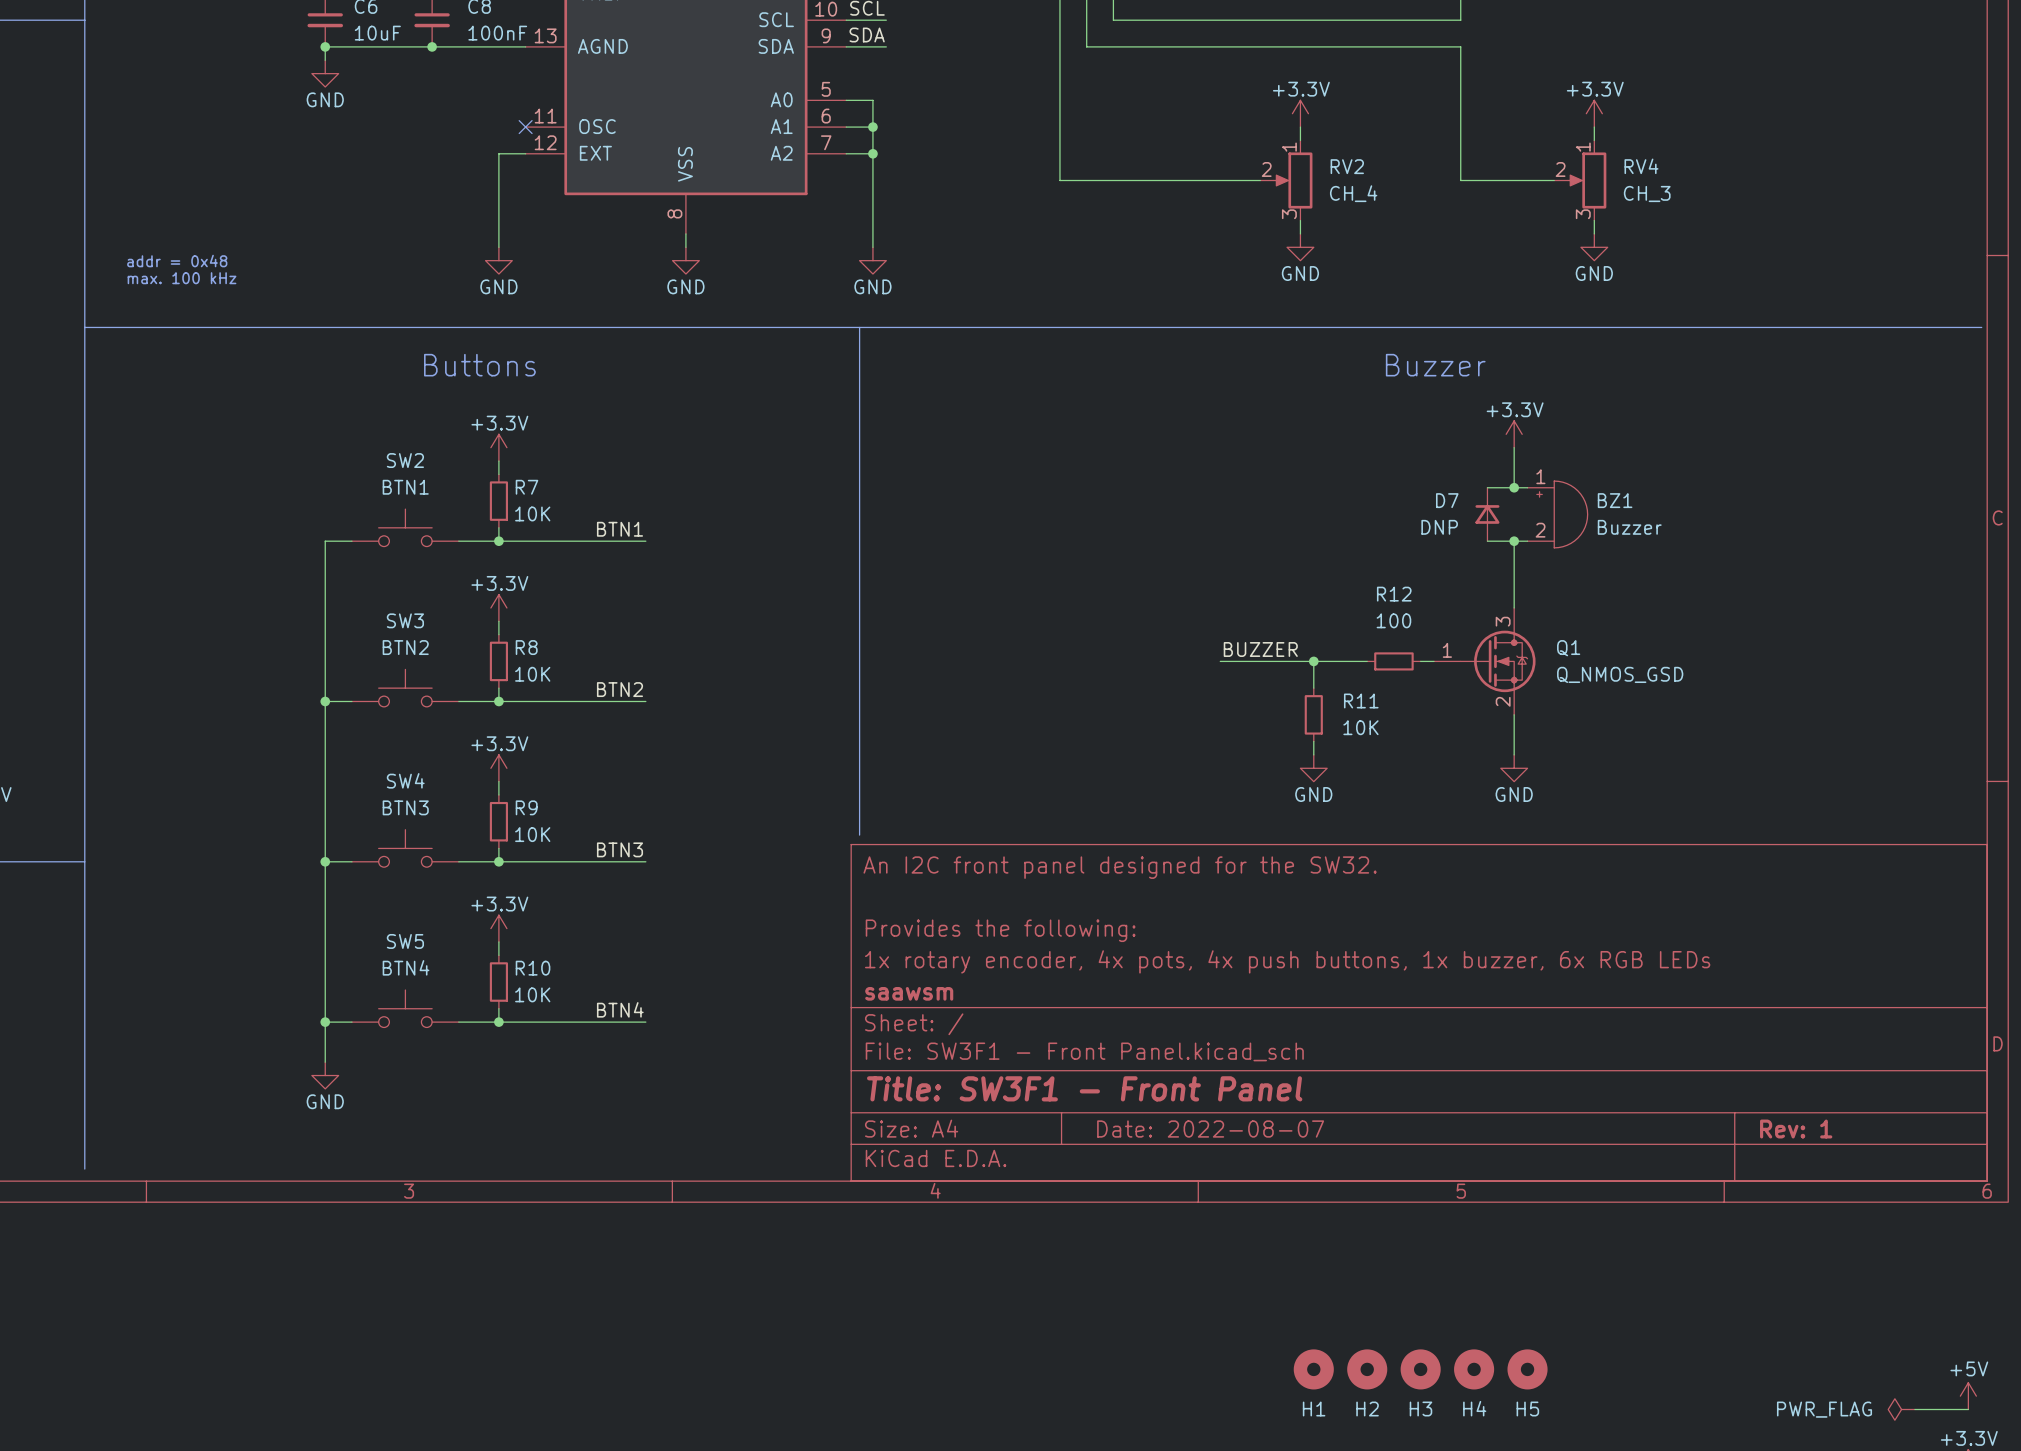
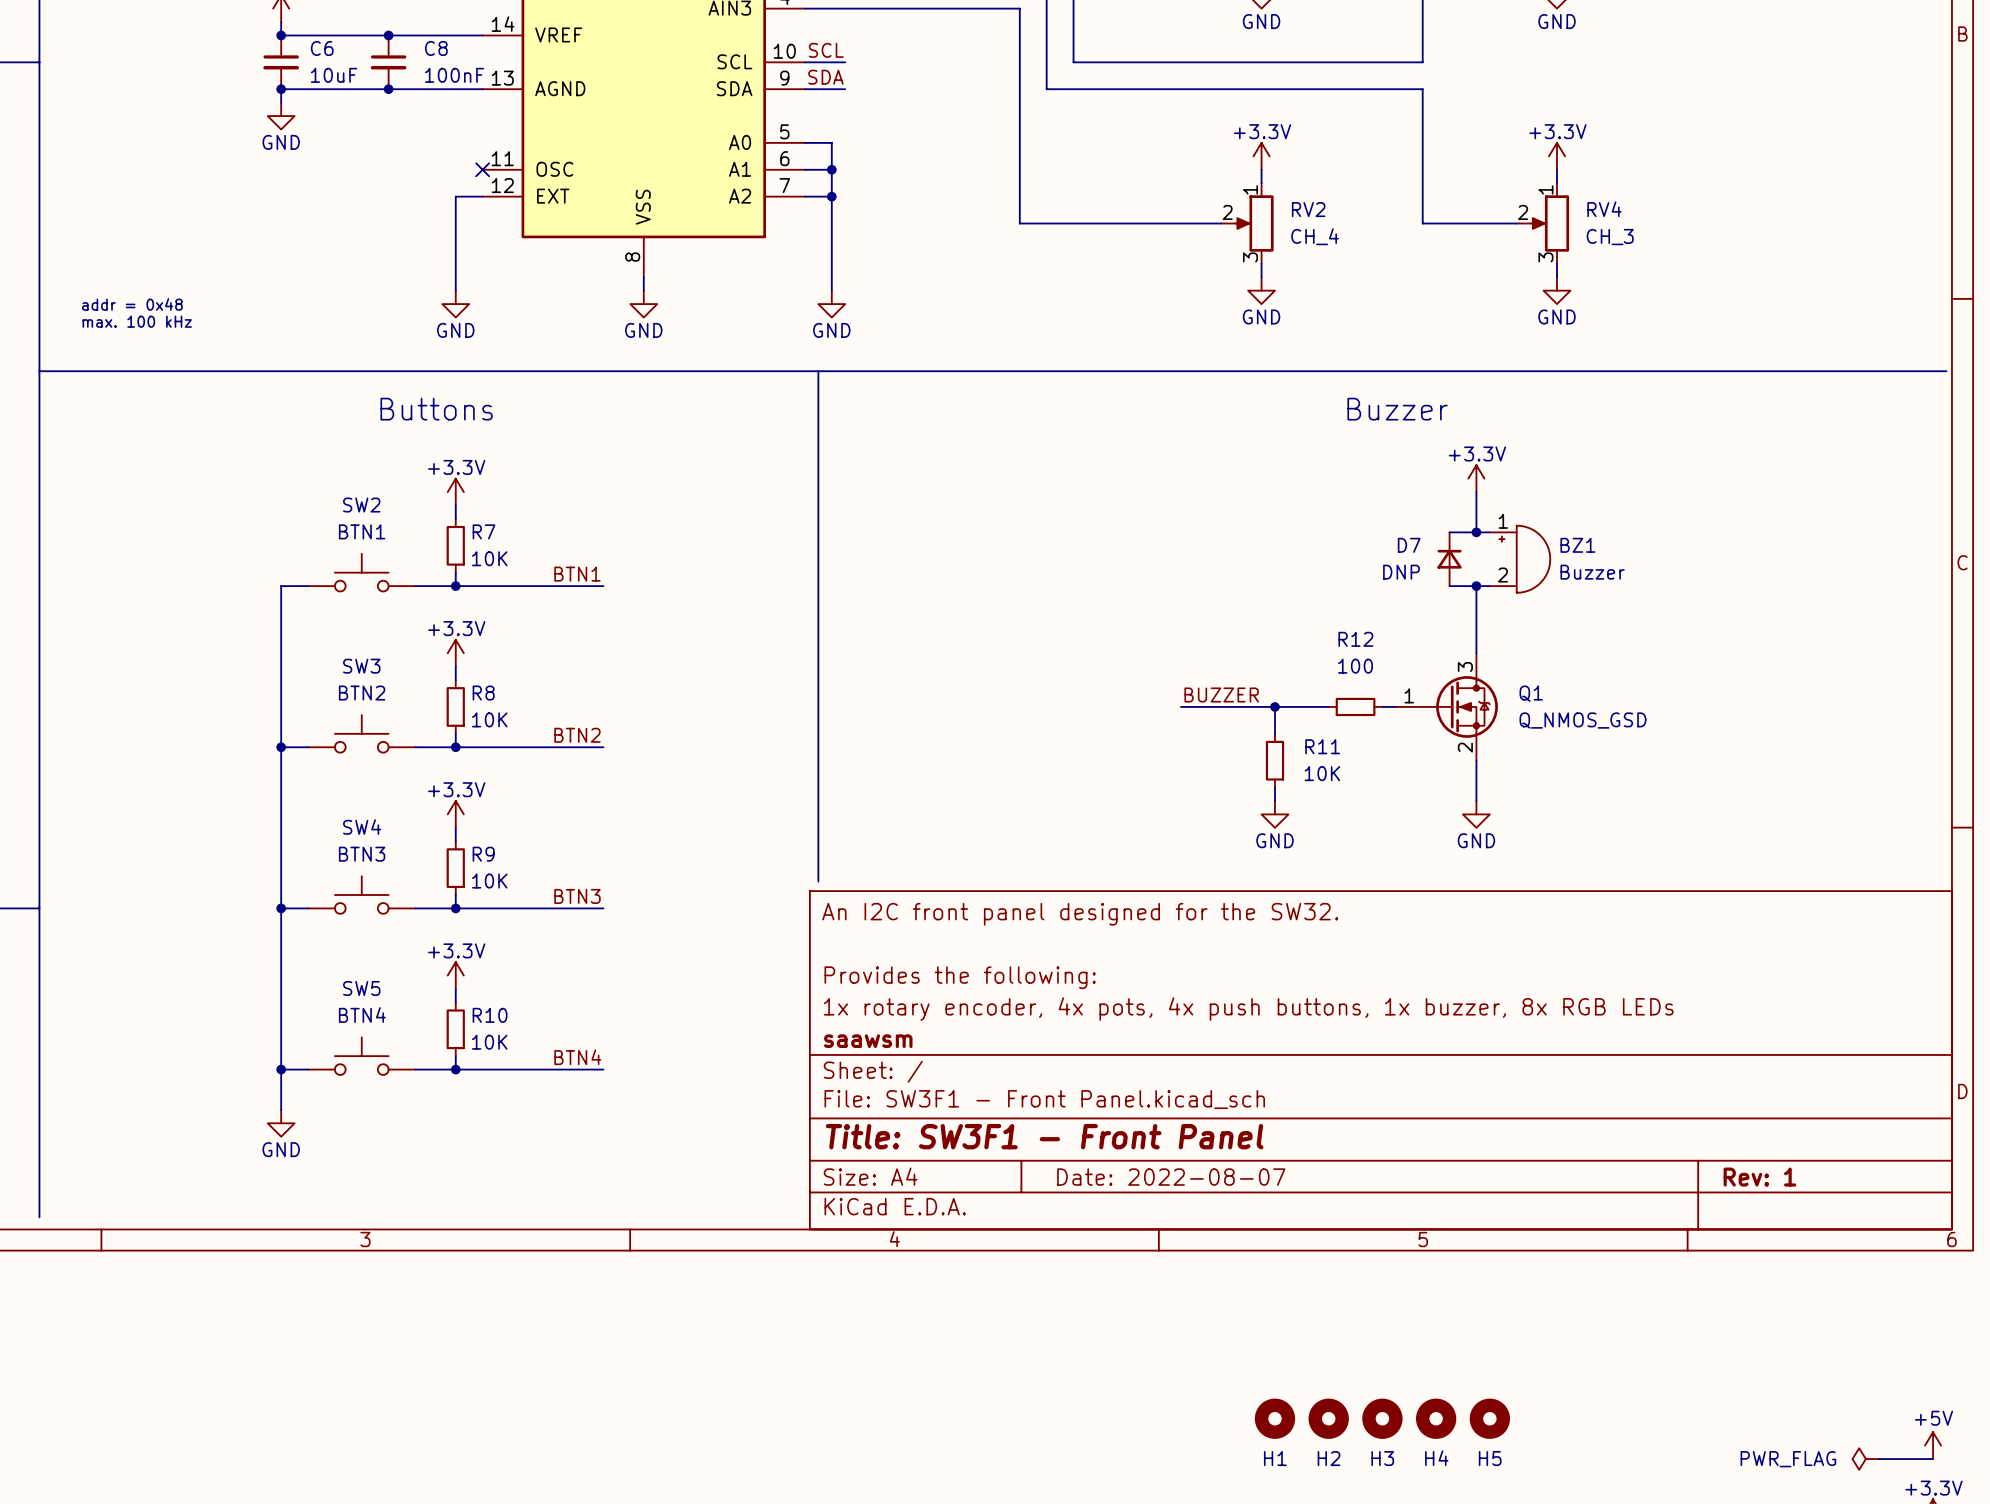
title block: 1x rotary encoder, 4x pots, 4x push buttons, 1x buzzer, 6x RGB LEDs (1287, 961) -> 1x rotary encoder, 4x pots, 4x push buttons, 1x buzzer, 8x RGB LEDs (1248, 1009)

